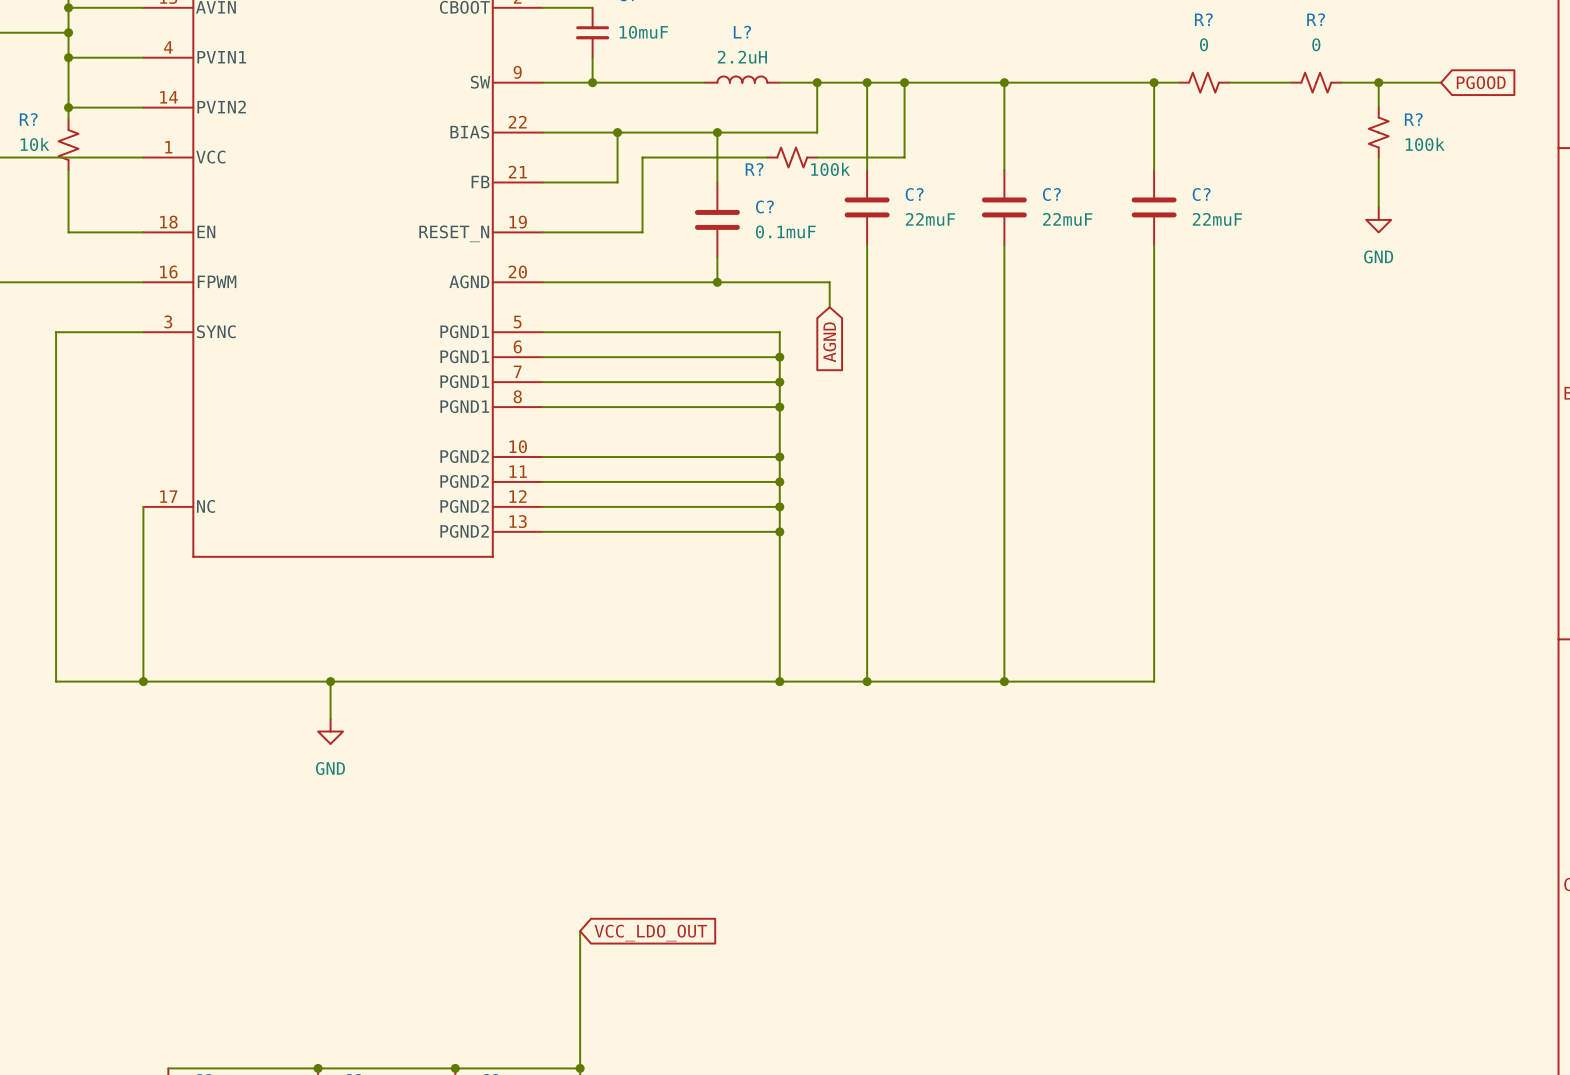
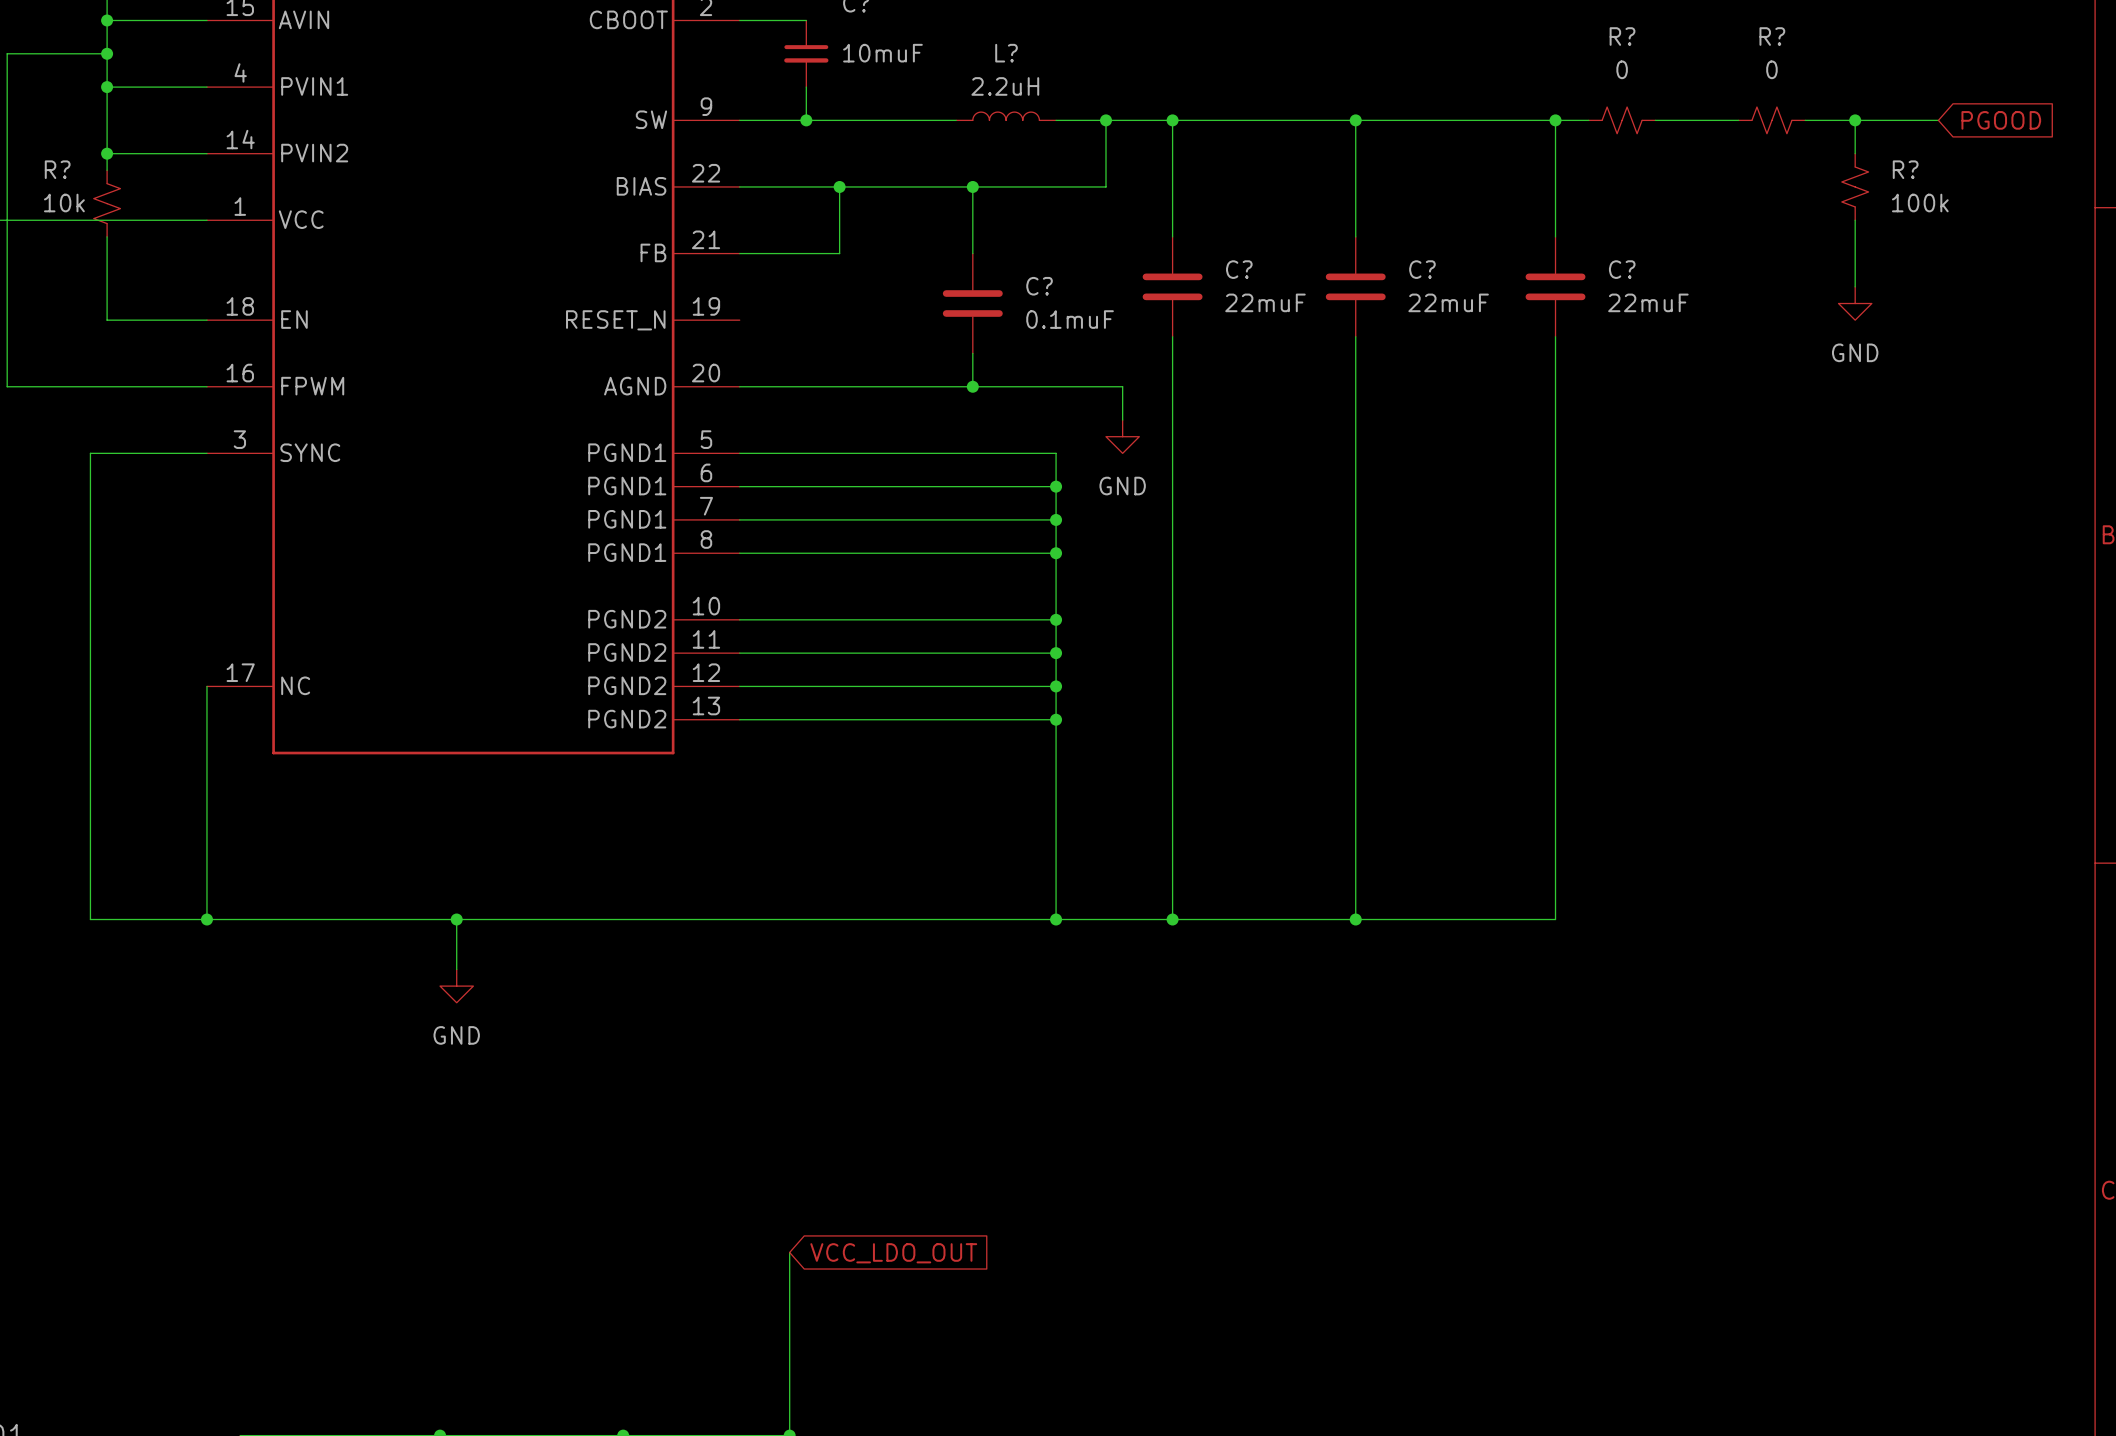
wire: (904, 82) (904, 157) (817, 157) -> none
junction: (904, 82) -> none
wire: (767, 157) (642, 157) (642, 232) (542, 232) -> none
R?: 100k (792, 157) -> none
power symbol: none -> GND (1122, 436)
global label: AGND (829, 342) -> none

